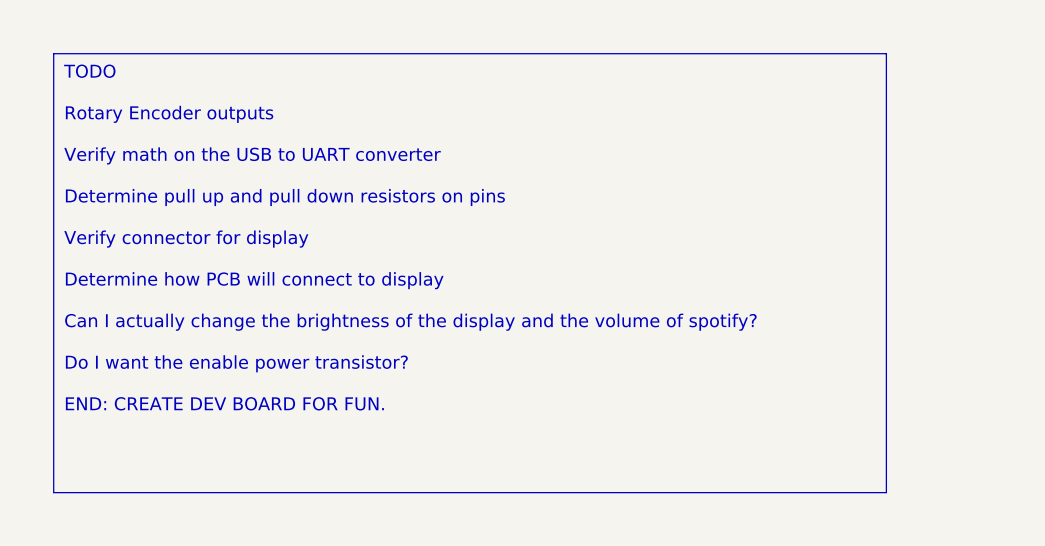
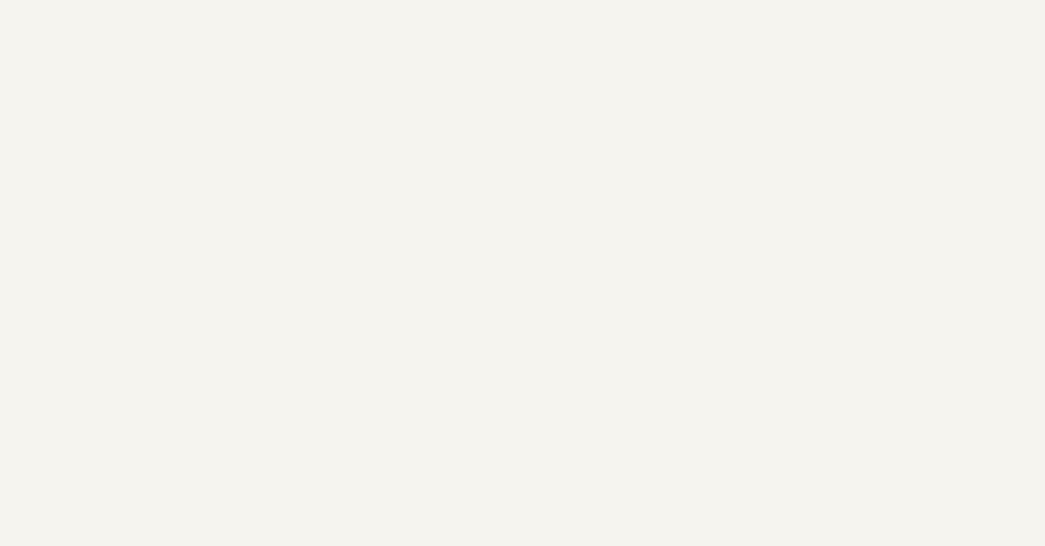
line: (53, 53) (886, 53) (886, 492) (53, 492) (53, 53) -> none
text: TODO (89, 71) -> none
text: Rotary Encoder outputs (169, 114) -> none
text: Verify math on the USB to UART converter (252, 155) -> none
text: Determine pull up and pull down resistors on pins (285, 197) -> none
text: Verify connector for display (186, 239) -> none
text: Determine how PCB will connect to display (254, 280) -> none
text: Can I actually change the brightness of the display and the volume of spotify? (410, 322) -> none
text: Do I want the enable power transistor? (236, 363) -> none
text: END: CREATE DEV BOARD FOR FUN. (224, 403) -> none

